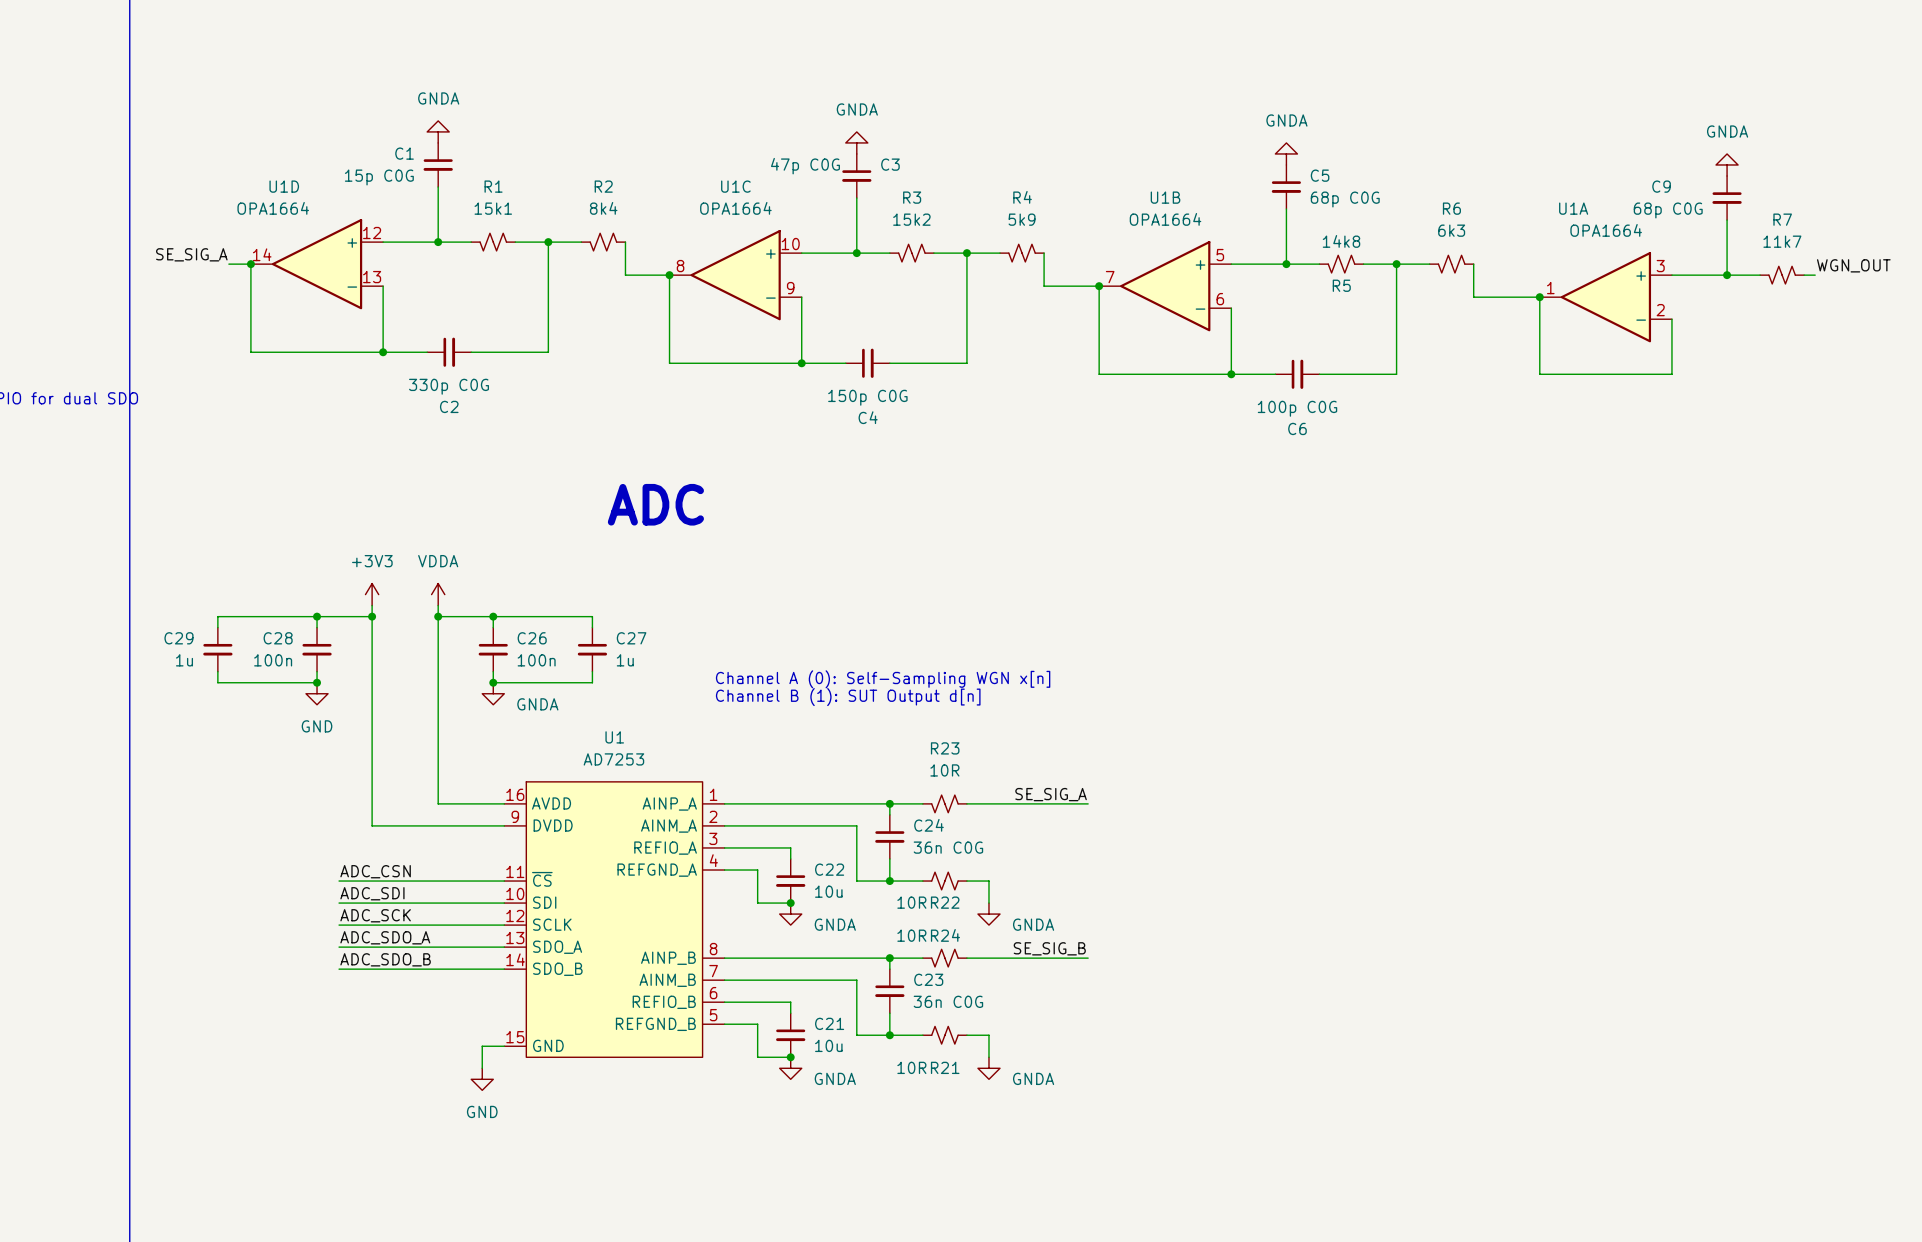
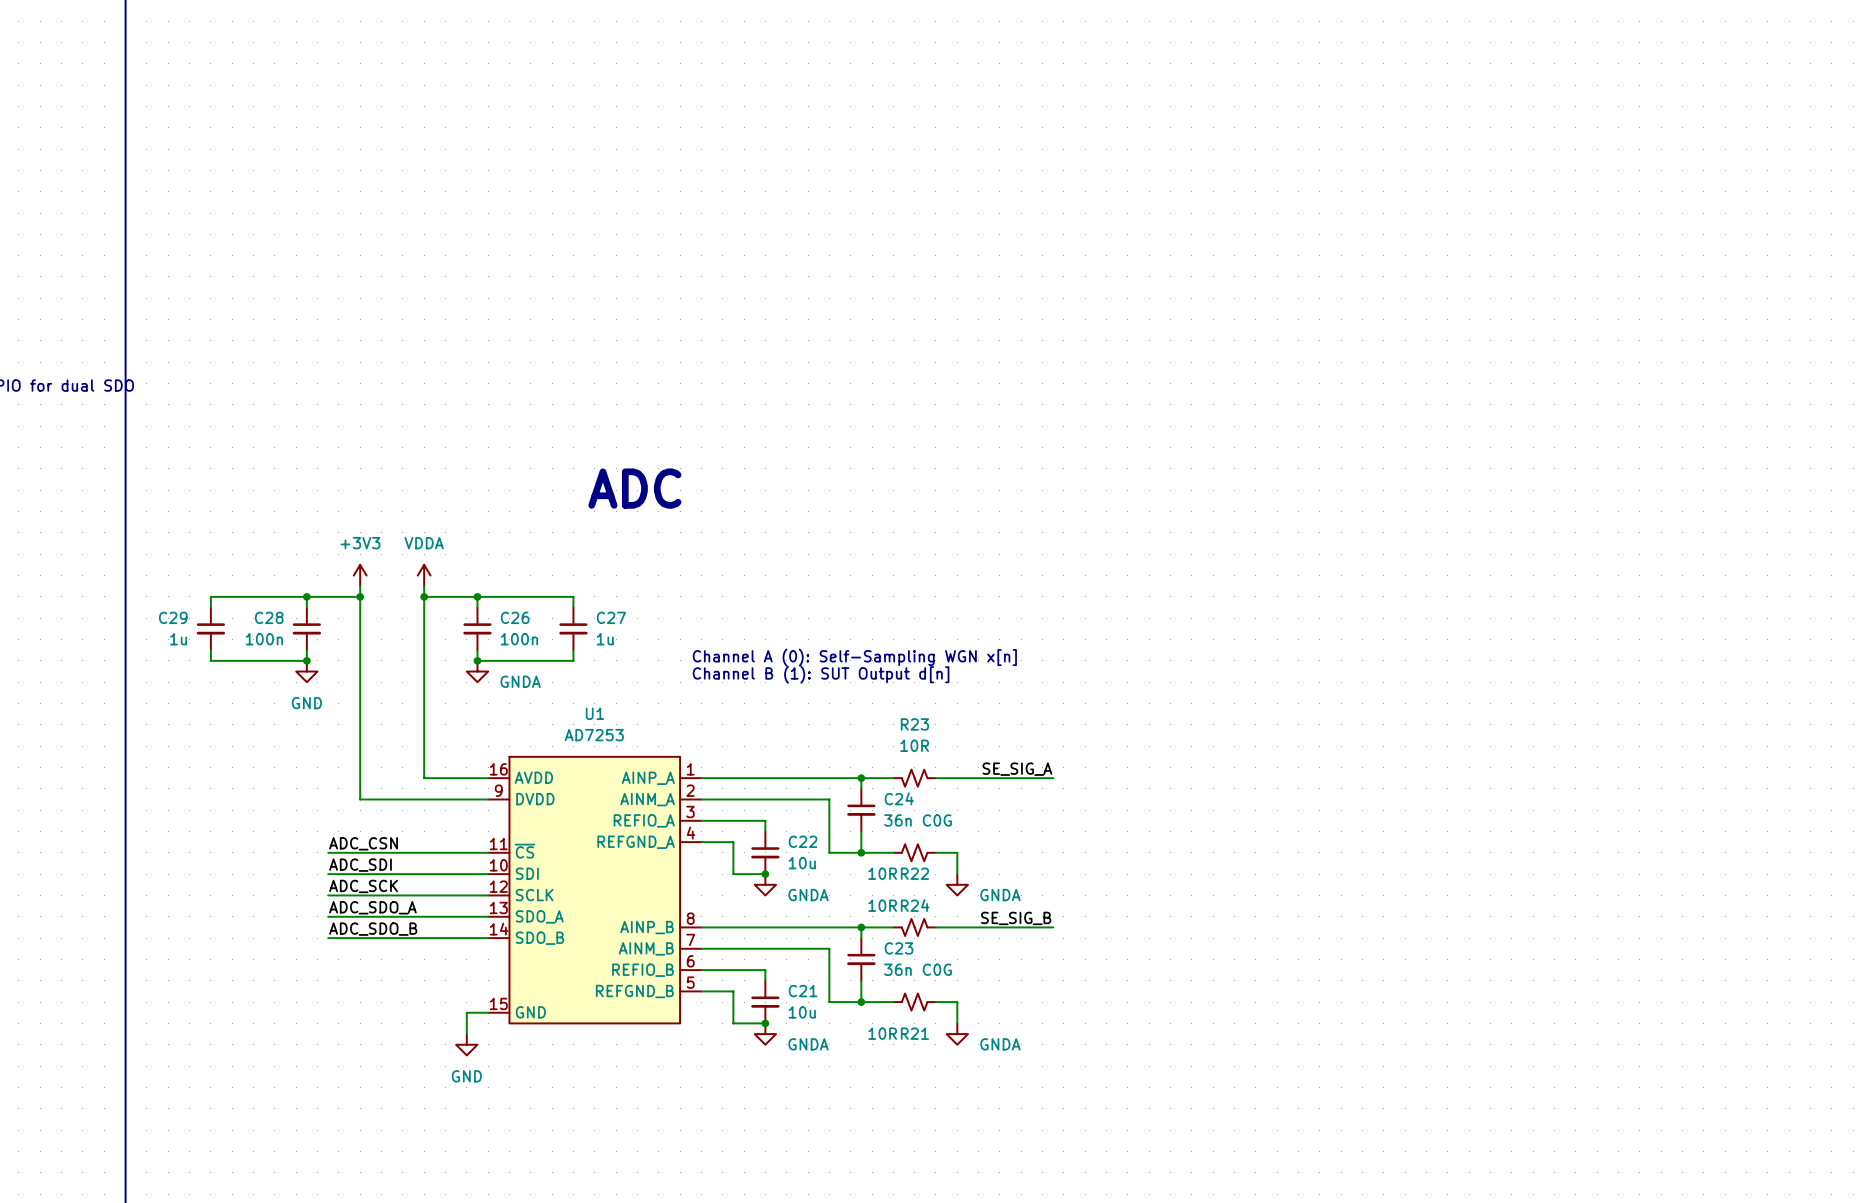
power symbol: GNDA (438, 131) -> none
power symbol: GNDA (856, 142) -> none
power symbol: GNDA (1286, 153) -> none
C1: 15p C0G (438, 164) -> none
power symbol: GNDA (1727, 164) -> none
C3: 47p C0G (856, 176) -> none
wire: (438, 187) (438, 242) -> none
C5: 68p C0G (1286, 187) -> none
wire: (856, 198) (856, 253) -> none
C9: 68p C0G (1727, 198) -> none
wire: (1286, 209) (1286, 264) -> none
wire: (1727, 220) (1727, 275) -> none
wire: (383, 242) (471, 242) -> none
junction: (438, 242) -> none
R1: 15k1 (493, 242) -> none
wire: (515, 242) (581, 242) -> none
wire: (548, 242) (548, 352) (471, 352) -> none
junction: (548, 242) -> none
R2: 8k4 (603, 242) -> none
wire: (625, 242) (625, 275) (669, 275) (669, 363) (845, 363) -> none
wire: (801, 253) (889, 253) -> none
junction: (856, 253) -> none
R3: 15k2 (911, 253) -> none
wire: (933, 253) (1000, 253) -> none
wire: (966, 253) (966, 363) (889, 363) -> none
junction: (966, 253) -> none
R4: 5k9 (1022, 253) -> none
wire: (1044, 253) (1044, 286) (1099, 286) (1099, 374) (1275, 374) -> none
label: SE_SIG_A (191, 254) -> none
wire: (228, 264) (250, 264) (250, 352) (427, 352) -> none
junction: (250, 264) -> none
U1D: OPA1664 (317, 264) -> none
wire: (1231, 264) (1319, 264) -> none
junction: (1286, 264) -> none
R5: 14k8 (1341, 264) -> none
wire: (1363, 264) (1429, 264) -> none
wire: (1396, 264) (1396, 374) (1319, 374) -> none
junction: (1396, 264) -> none
R6: 6k3 (1451, 264) -> none
wire: (1473, 264) (1473, 297) (1539, 297) (1539, 374) (1671, 374) (1671, 319) -> none
label: WGN_OUT (1853, 265) -> none
junction: (669, 275) -> none
U1C: OPA1664 (735, 275) -> none
wire: (1671, 275) (1760, 275) -> none
junction: (1727, 275) -> none
R7: 11k7 (1782, 275) -> none
wire: (1804, 275) (1815, 275) -> none
wire: (383, 286) (383, 352) -> none
junction: (1099, 286) -> none
U1B: OPA1664 (1165, 286) -> none
wire: (801, 297) (801, 363) -> none
junction: (1539, 297) -> none
U1A: OPA1664 (1605, 297) -> none
wire: (1231, 308) (1231, 374) -> none
junction: (383, 352) -> none
C2: 330p C0G (449, 352) -> none
junction: (801, 363) -> none
C4: 150p C0G (867, 363) -> none
junction: (1231, 374) -> none
C6: 100p C0G (1297, 374) -> none

